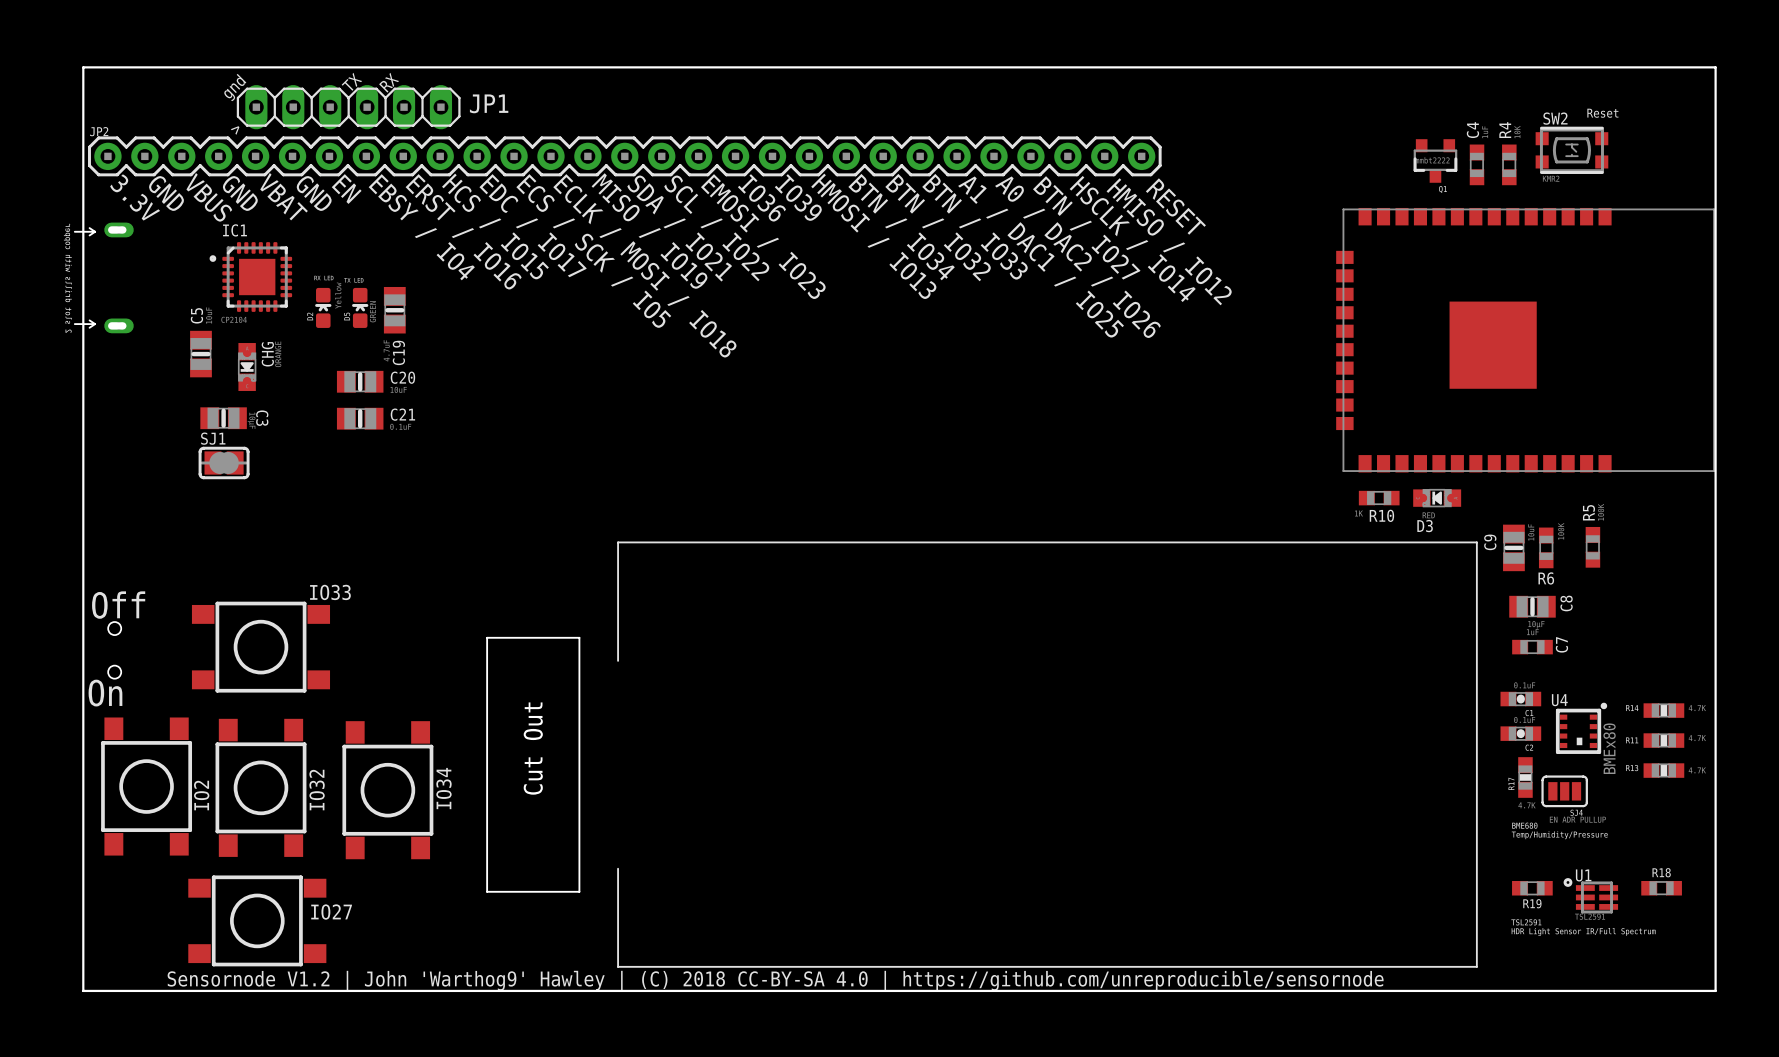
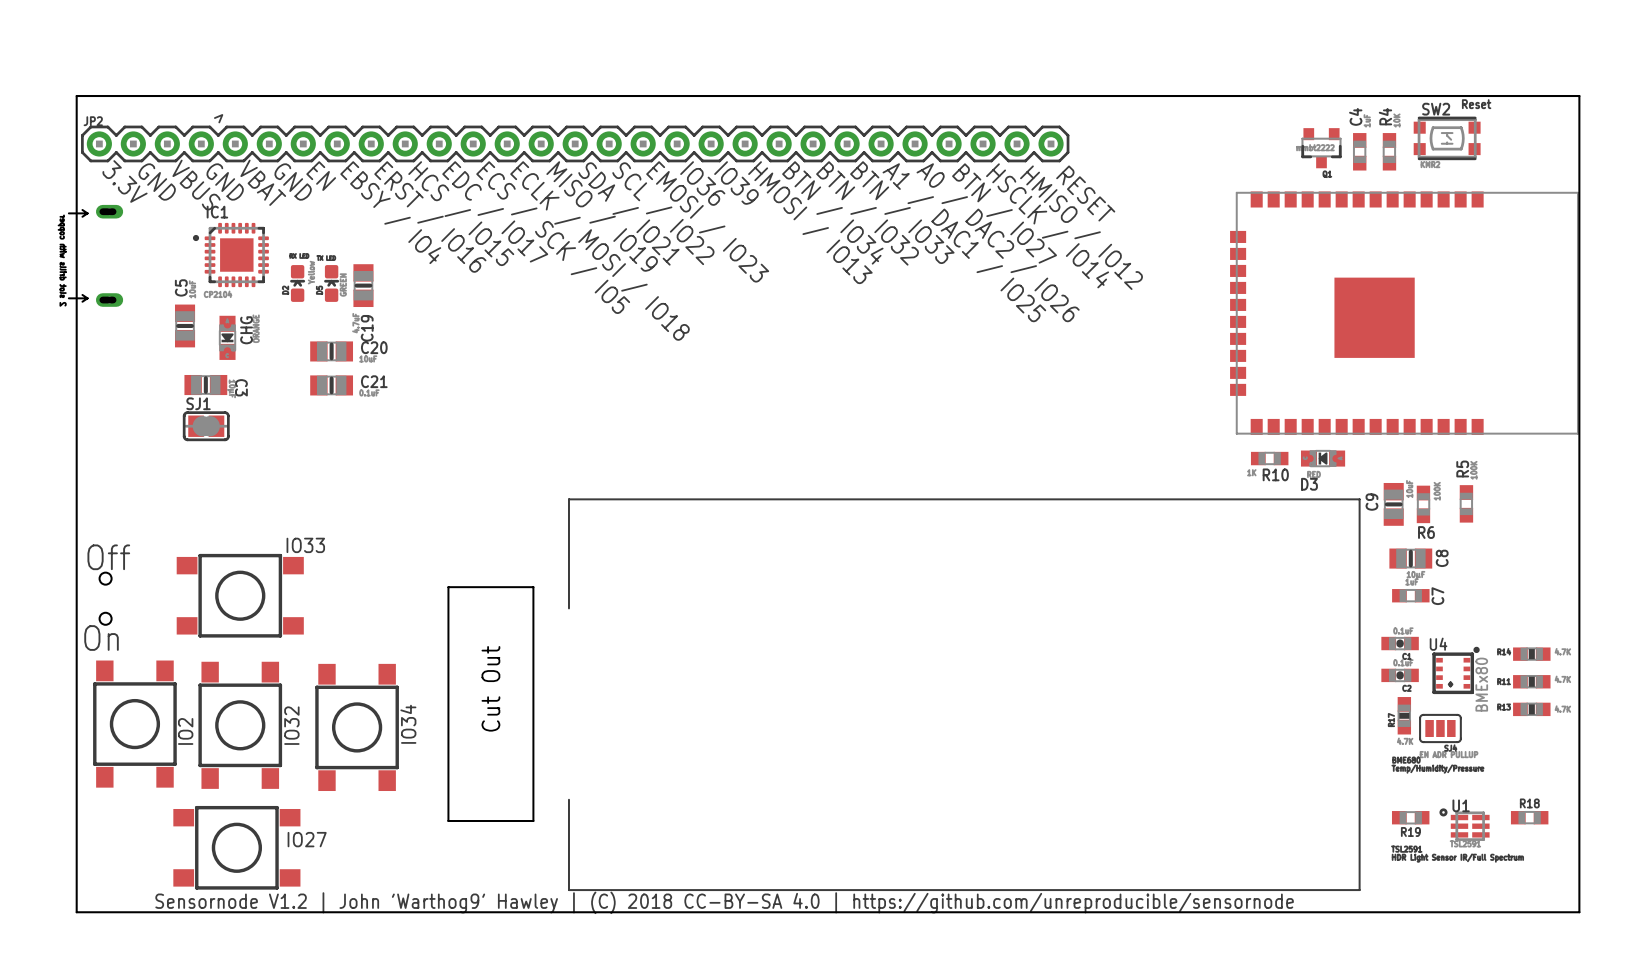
text: TX (351, 81) -> none
text: RX (389, 82) -> none
text: gnd (235, 87) -> none
board edge: (83, 104) (83, 67) (1715, 67) (1715, 104) -> (76, 96) (1579, 96)
JP1: (348, 107) -> none

